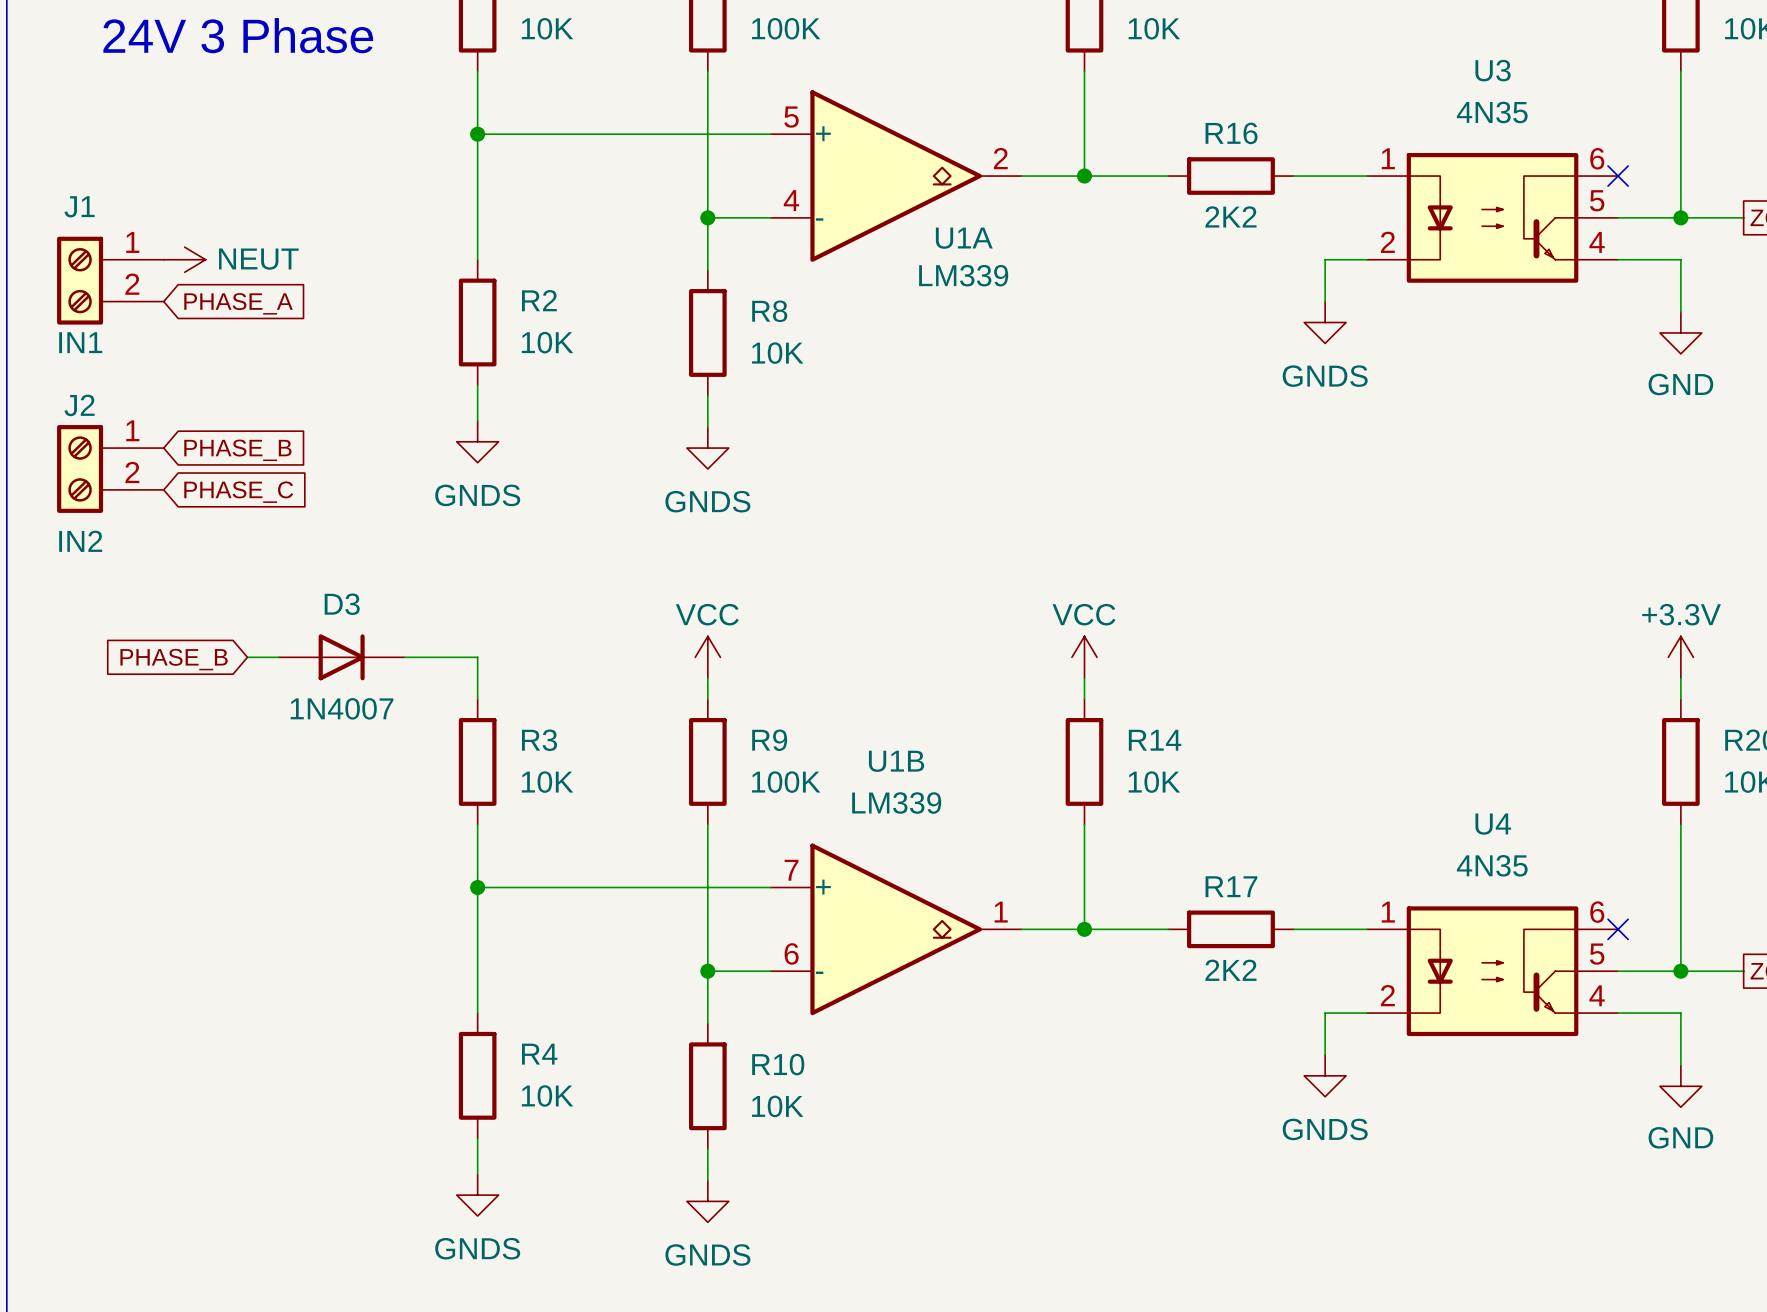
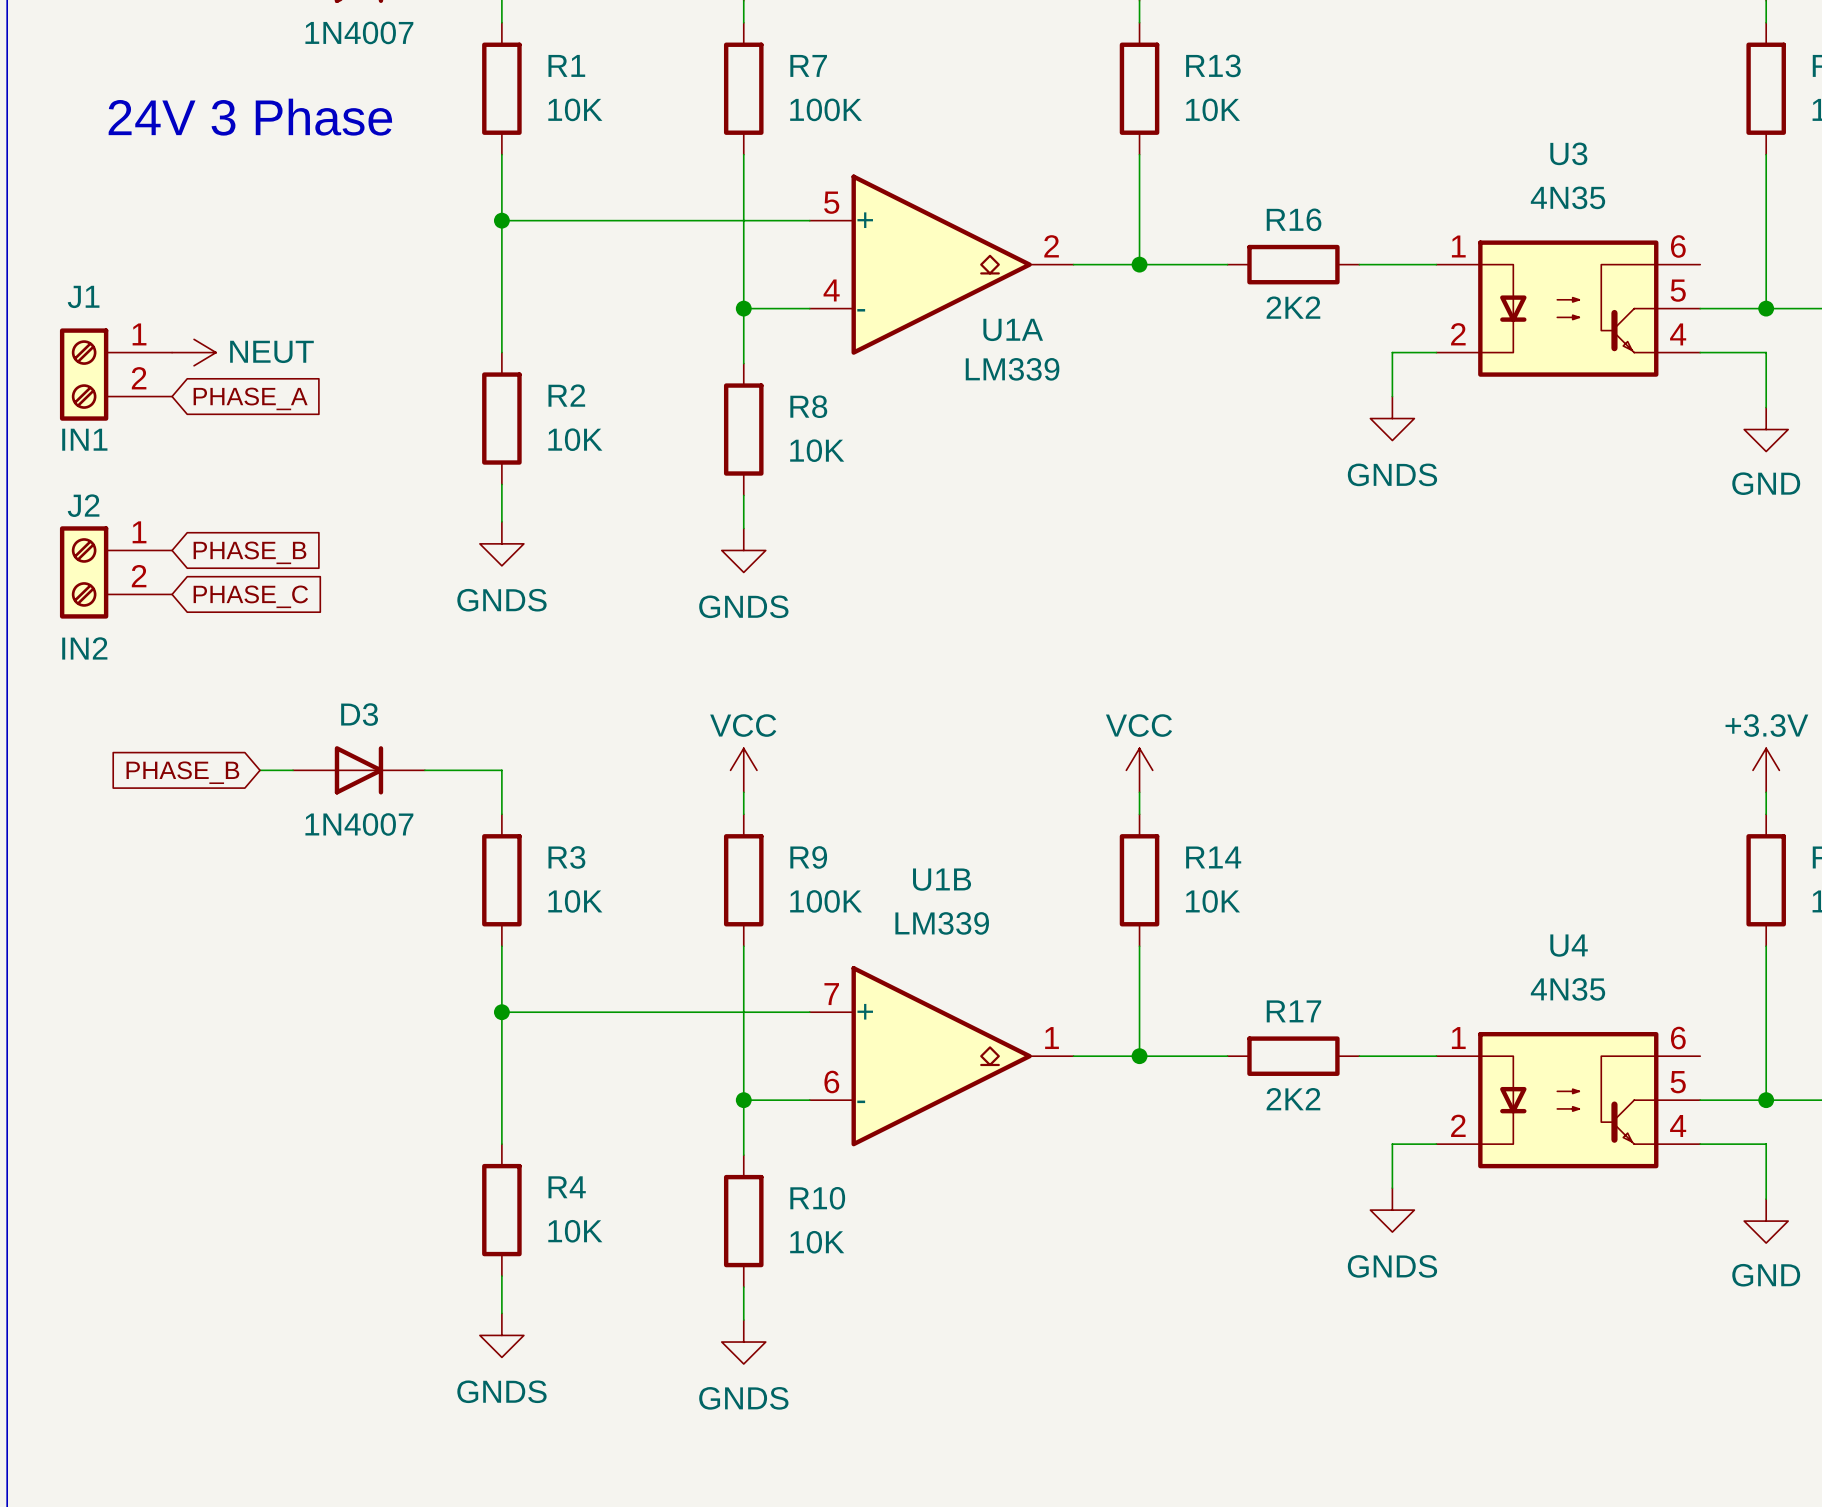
no-connect mark: (1618, 176) -> none
no-connect mark: (1618, 929) -> none

